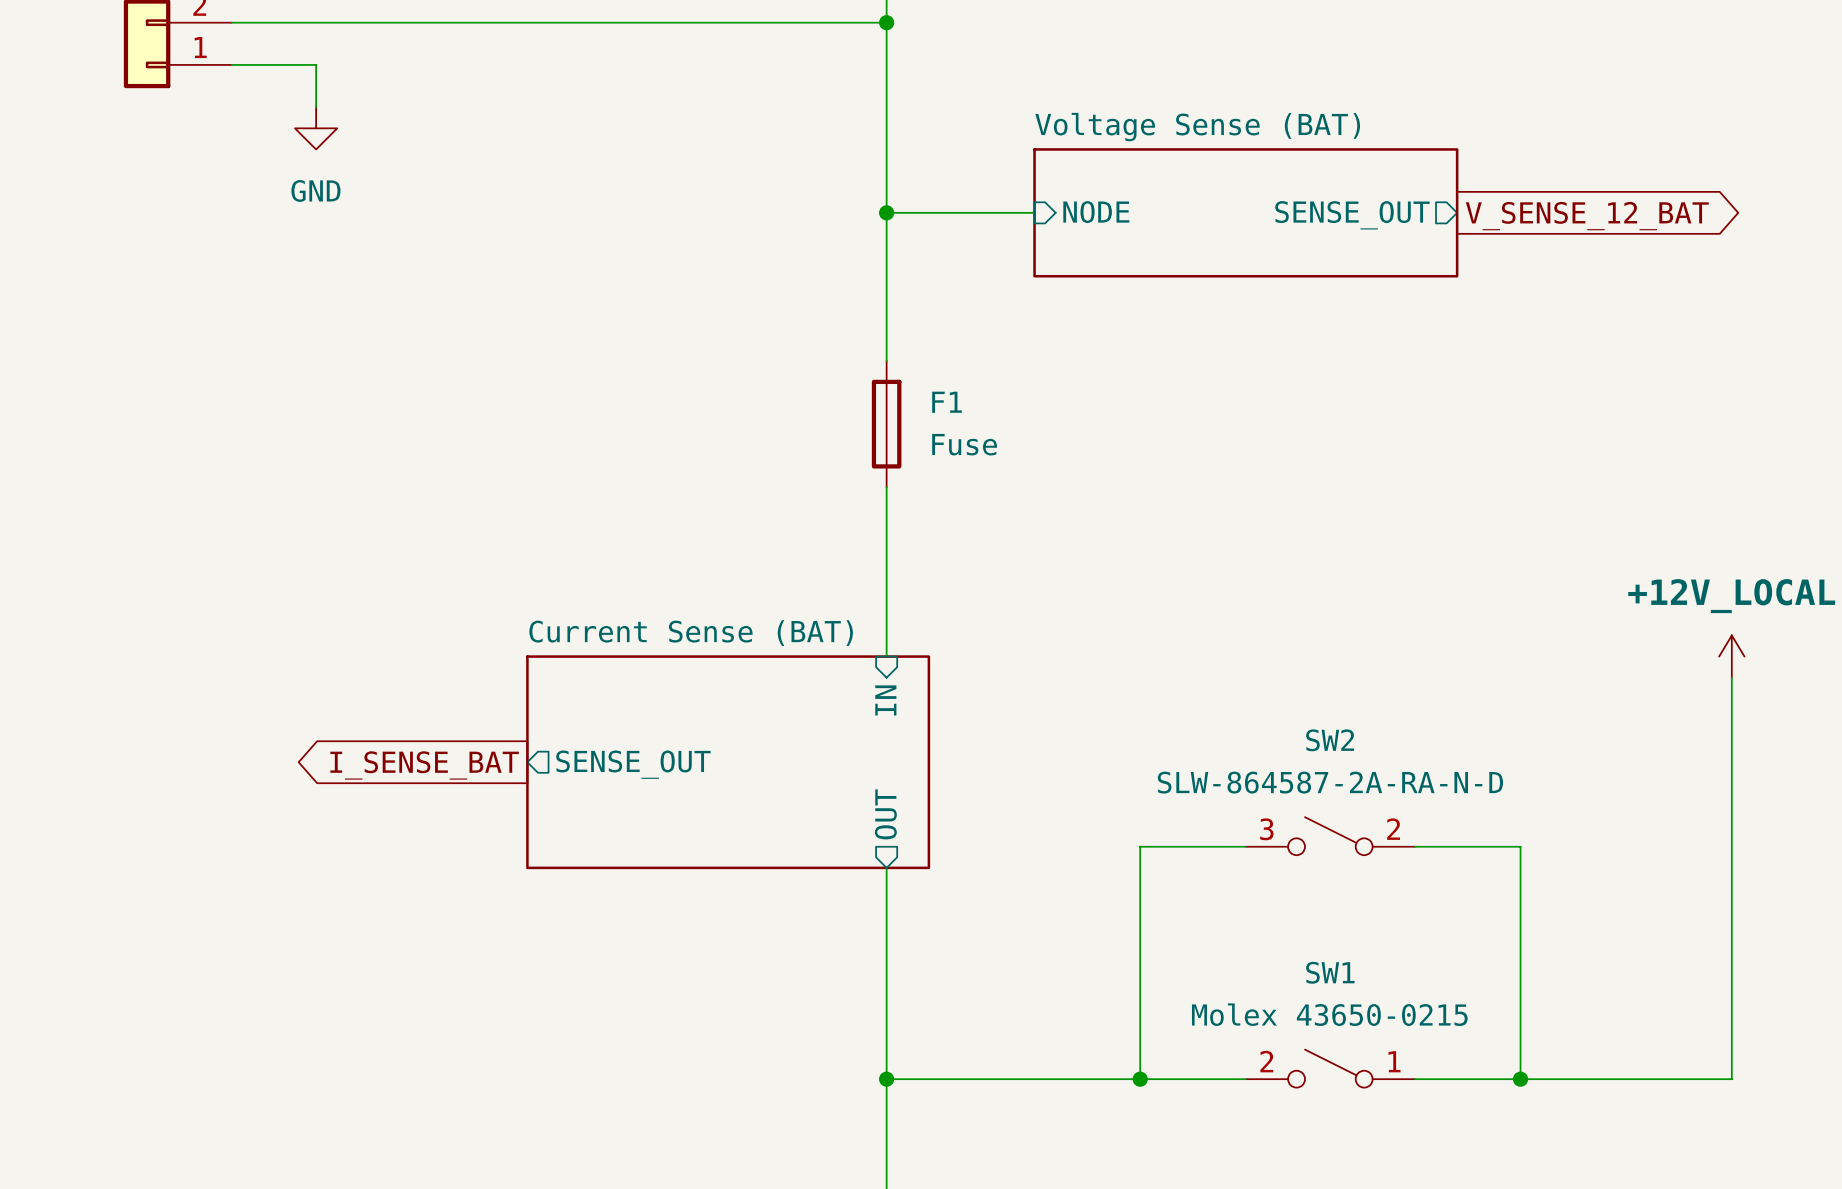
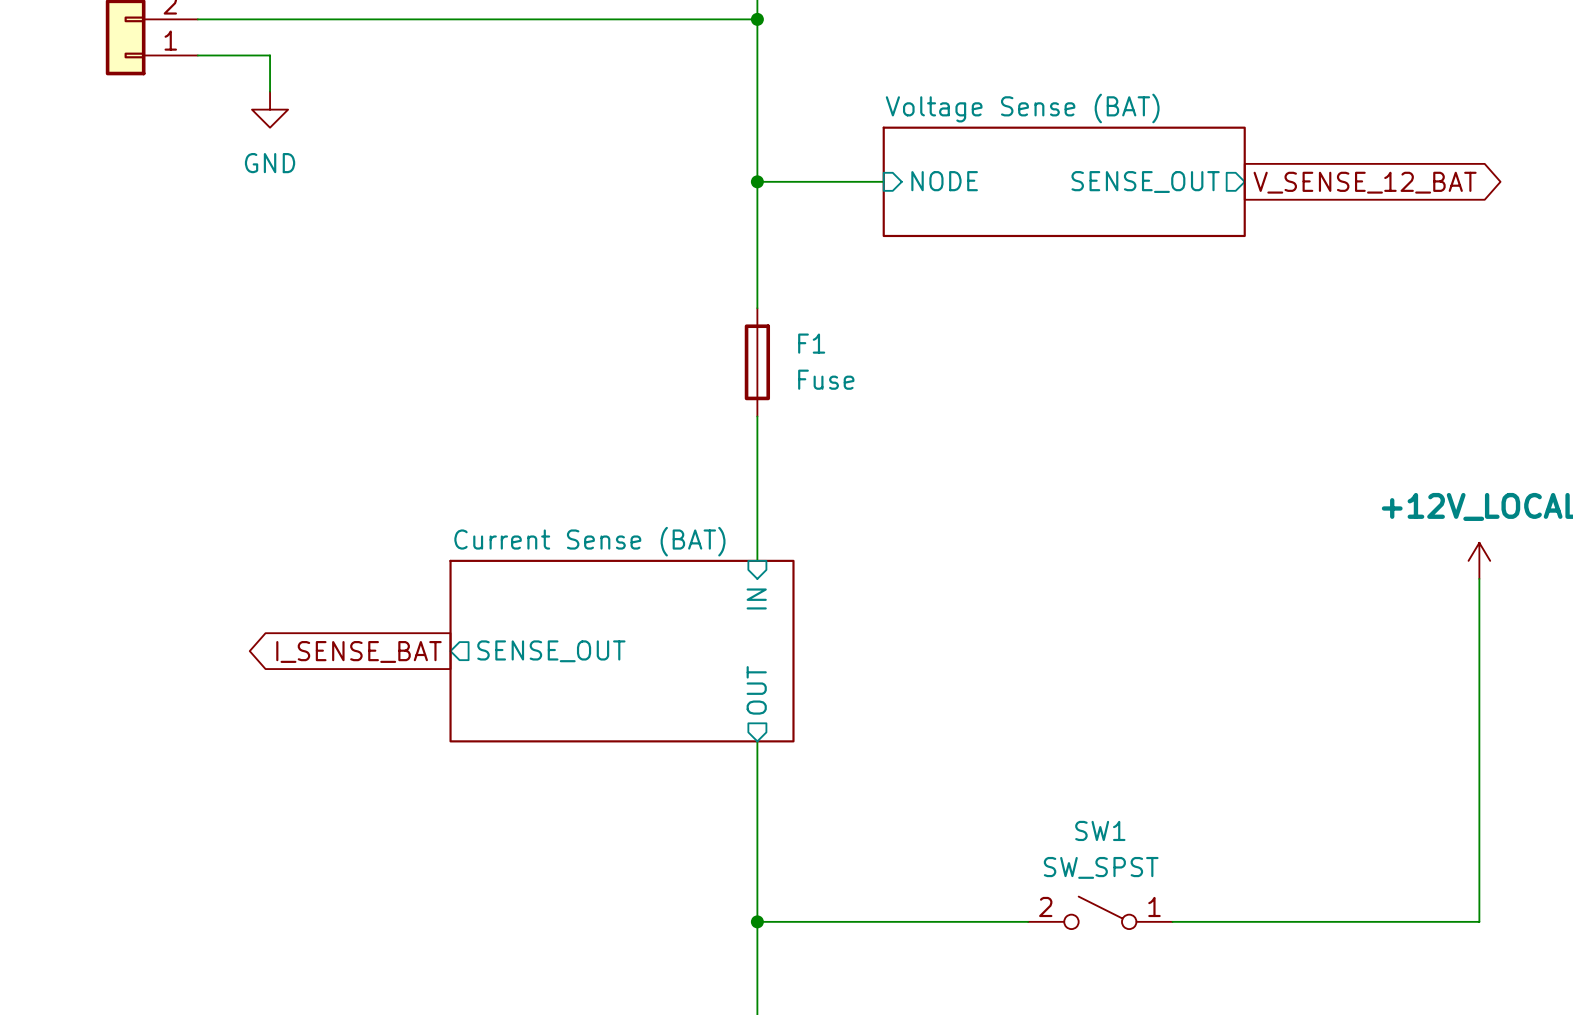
SW2: SLW-864587-2A-RA-N-D (1330, 836) -> none
wire: (1245, 846) (1140, 846) (1140, 1079) -> none
wire: (1414, 846) (1520, 846) (1520, 1079) -> none
SW1 value: Molex 43650-0215 (1329, 1014) -> SW_SPST (1101, 867)
SW1 position: (1330, 1068) -> (1100, 912)
junction: (1140, 1079) -> none
junction: (1520, 1079) -> none

